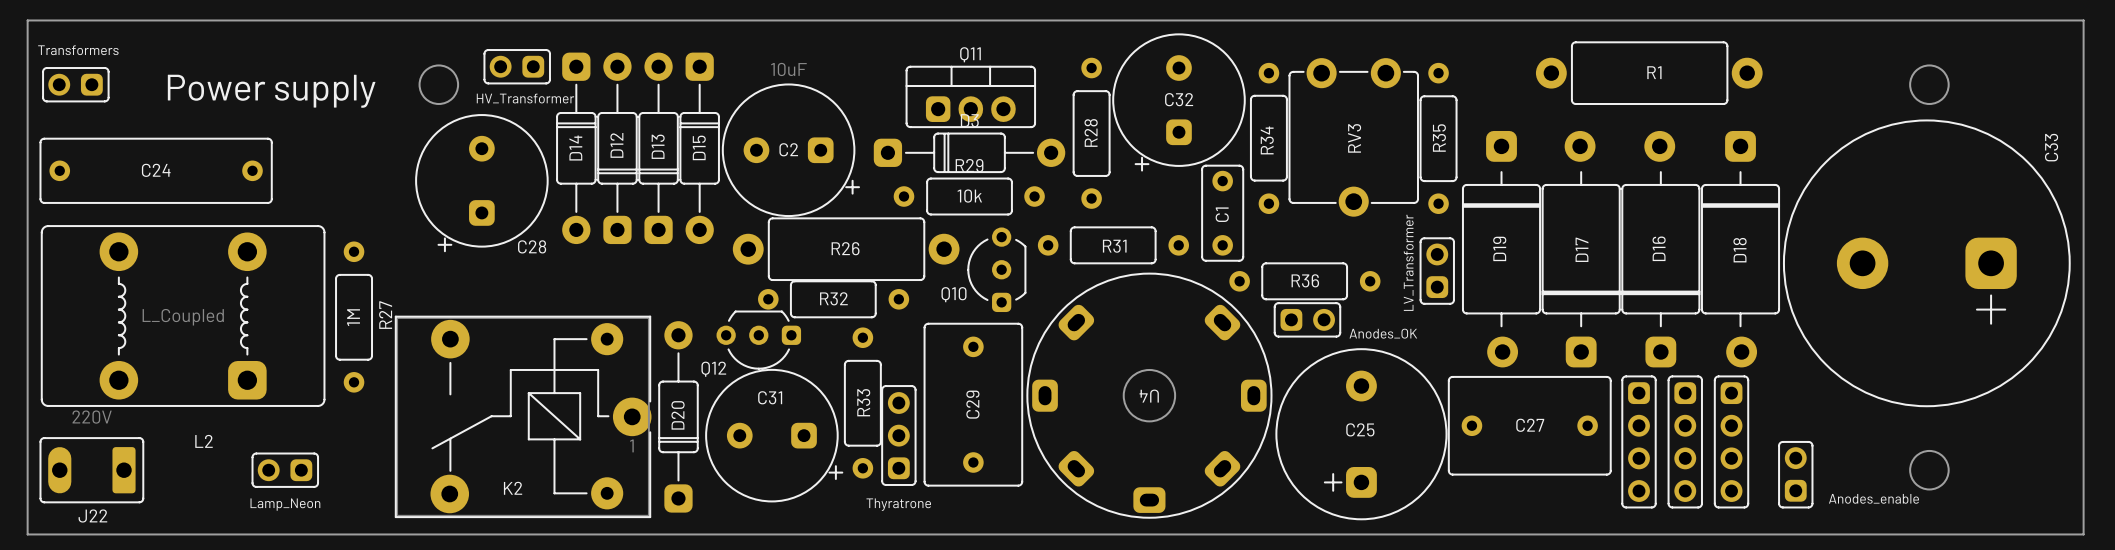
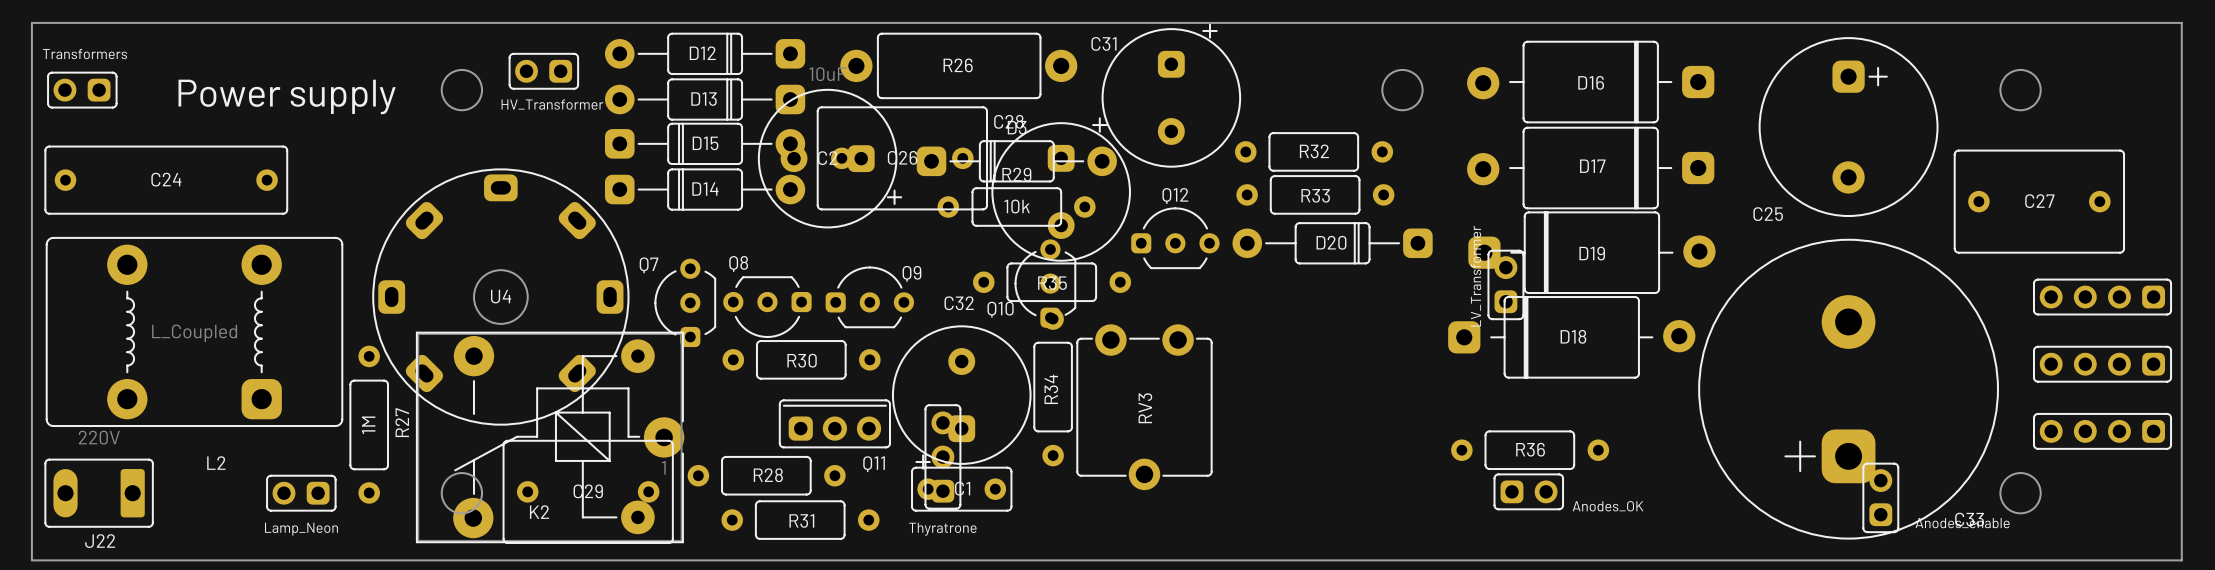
Q11 name position: Q11 (970, 54) -> Q11 (874, 464)
round board edge: none -> [1381, 69, 1424, 111]
Q11 footprint: [905, 65, 1036, 128] -> [779, 399, 891, 449]
R1: (1649, 73) -> none
C32 name position: C32 (1179, 99) -> C32 (959, 303)
C32 position: (1178, 102) -> (961, 397)
R28 rotation: 0° (1091, 133) -> 90° clockwise (766, 475)
R28 position: (1091, 133) -> (766, 475)
RV3 position: (1353, 137) -> (1144, 407)
R34 position: (1268, 138) -> (1053, 387)
R35 rotation: 0° (1438, 138) -> 90° clockwise (1052, 282)
R35 position: (1438, 138) -> (1052, 282)
D14 rotation: 0° (576, 148) -> 90° counterclockwise (705, 189)
D12 rotation: 0° (617, 148) -> 90° counterclockwise (705, 53)
D13 rotation: 0° (658, 148) -> 90° counterclockwise (705, 99)
D15 rotation: 0° (699, 148) -> 90° counterclockwise (705, 143)
C26: none -> (902, 158)
C28 rotation: 0° (481, 183) -> 180° (1061, 189)
C28 position: (481, 183) -> (1061, 189)
C1 rotation: 0° (1222, 213) -> 90° clockwise (961, 489)
C1 position: (1222, 213) -> (961, 489)
R31 position: (1113, 245) -> (800, 520)
R26 position: (846, 249) -> (958, 65)
D19 rotation: 0° (1501, 249) -> 90° counterclockwise (1591, 252)
D17 rotation: 0° (1581, 249) -> 90° counterclockwise (1590, 168)
D16 rotation: 0° (1660, 249) -> 90° counterclockwise (1590, 82)
D16 position: (1660, 249) -> (1590, 82)
D18 rotation: 0° (1740, 249) -> 90° counterclockwise (1571, 337)
D18 position: (1740, 249) -> (1571, 337)
C33 rotation: 0° (1926, 263) -> 90° clockwise (1848, 389)
C33 position: (1926, 263) -> (1848, 389)
R36 position: (1304, 281) -> (1530, 450)
Q9: none -> (869, 297)
part: none -> (2102, 297)
Q7: none -> (685, 302)
Q8: none -> (767, 307)
R32 position: (833, 299) -> (1314, 151)
R27 position: (354, 317) -> (369, 424)
part position: (1307, 319) -> (1528, 491)
Q12 rotation: 0° (758, 340) -> 180° (1175, 238)
Q12 position: (758, 340) -> (1175, 238)
R30: none -> (801, 359)
part: none -> (2102, 364)
Q12 name position: Q12 (713, 369) -> Q12 (1175, 195)
U4 rotation: 0° (1149, 395) -> 180° (500, 297)
U4 position: (1149, 395) -> (500, 297)
C31 name position: C31 (770, 397) -> C31 (1103, 43)
R33 rotation: 0° (862, 403) -> 90° clockwise (1315, 194)
R33 position: (862, 403) -> (1315, 194)
C29 rotation: 0° (973, 404) -> 90° clockwise (588, 491)
C29 position: (973, 404) -> (588, 491)
part: none -> (2102, 431)
D20 rotation: 0° (678, 416) -> 90° counterclockwise (1332, 243)
D20 position: (678, 416) -> (1332, 243)
C27 position: (1529, 425) -> (2039, 201)
C25 name position: C25 (1360, 429) -> C25 (1768, 214)
C25 rotation: 0° (1361, 434) -> 180° (1848, 127)
C25 position: (1361, 434) -> (1848, 127)
C31 rotation: 0° (774, 435) -> 90° counterclockwise (1171, 95)
C31 position: (774, 435) -> (1171, 95)
part: (1639, 441) -> none
part: (1685, 441) -> none
part: (1731, 441) -> none
round board edge: none -> [441, 472, 483, 515]

